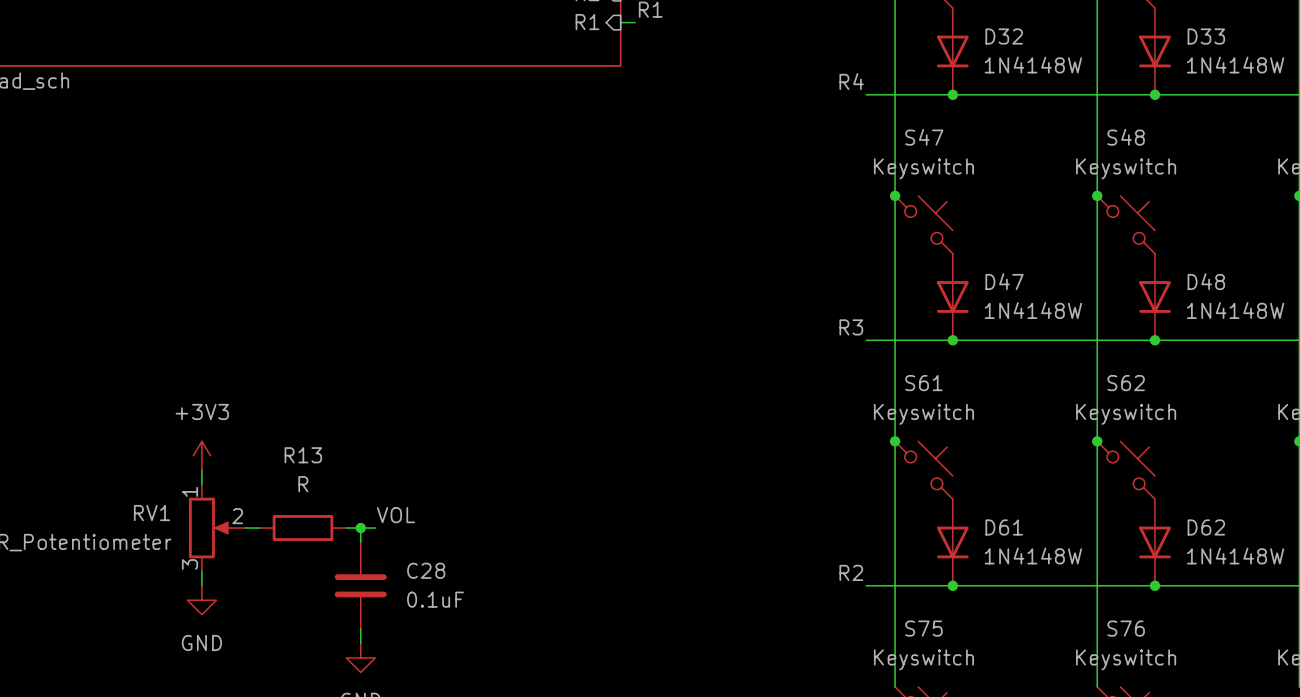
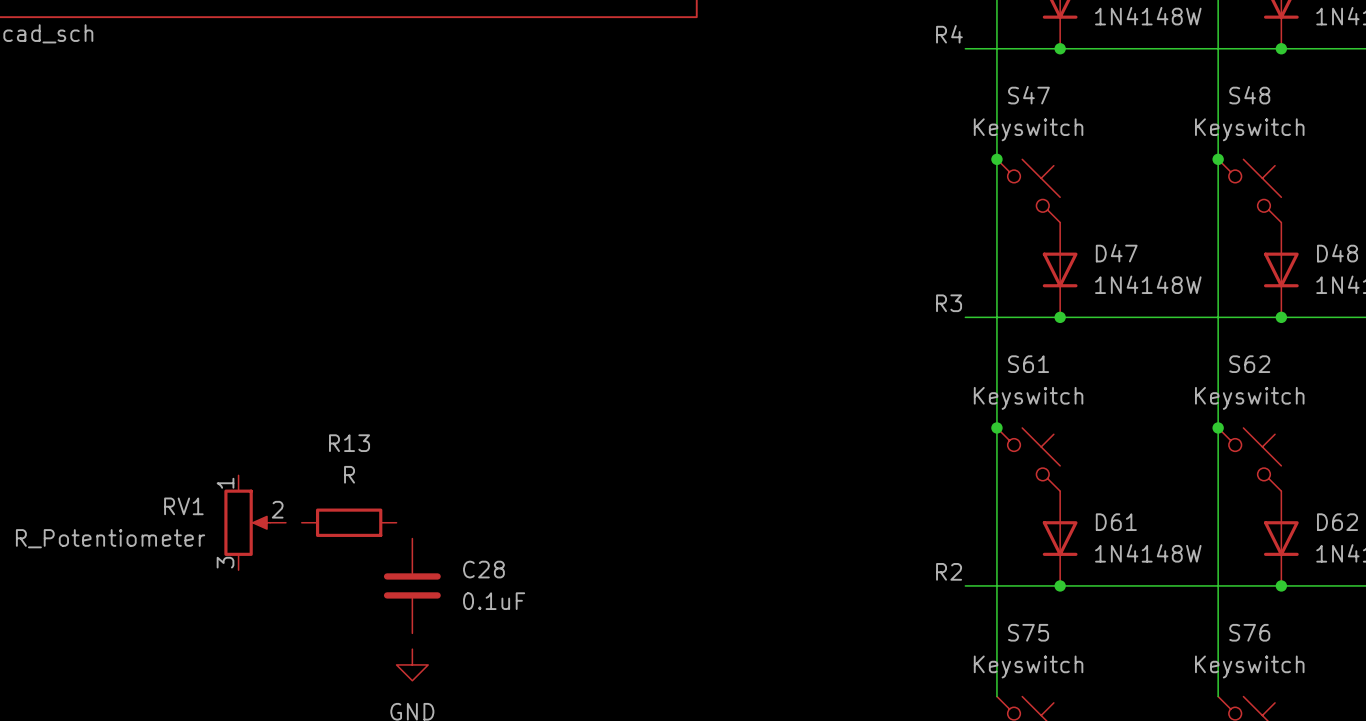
power symbol: +3V3 (201, 455) -> none
wire: (201, 470) (201, 484) -> none
label: VOL (395, 515) -> none
wire: (245, 528) (259, 528) -> none
wire: (346, 528) (375, 528) -> none
wire: (360, 528) (360, 542) -> none
junction: (360, 528) -> none
wire: (201, 571) (201, 585) -> none
power symbol: GND (201, 600) -> none
wire: (360, 629) (360, 643) -> none

